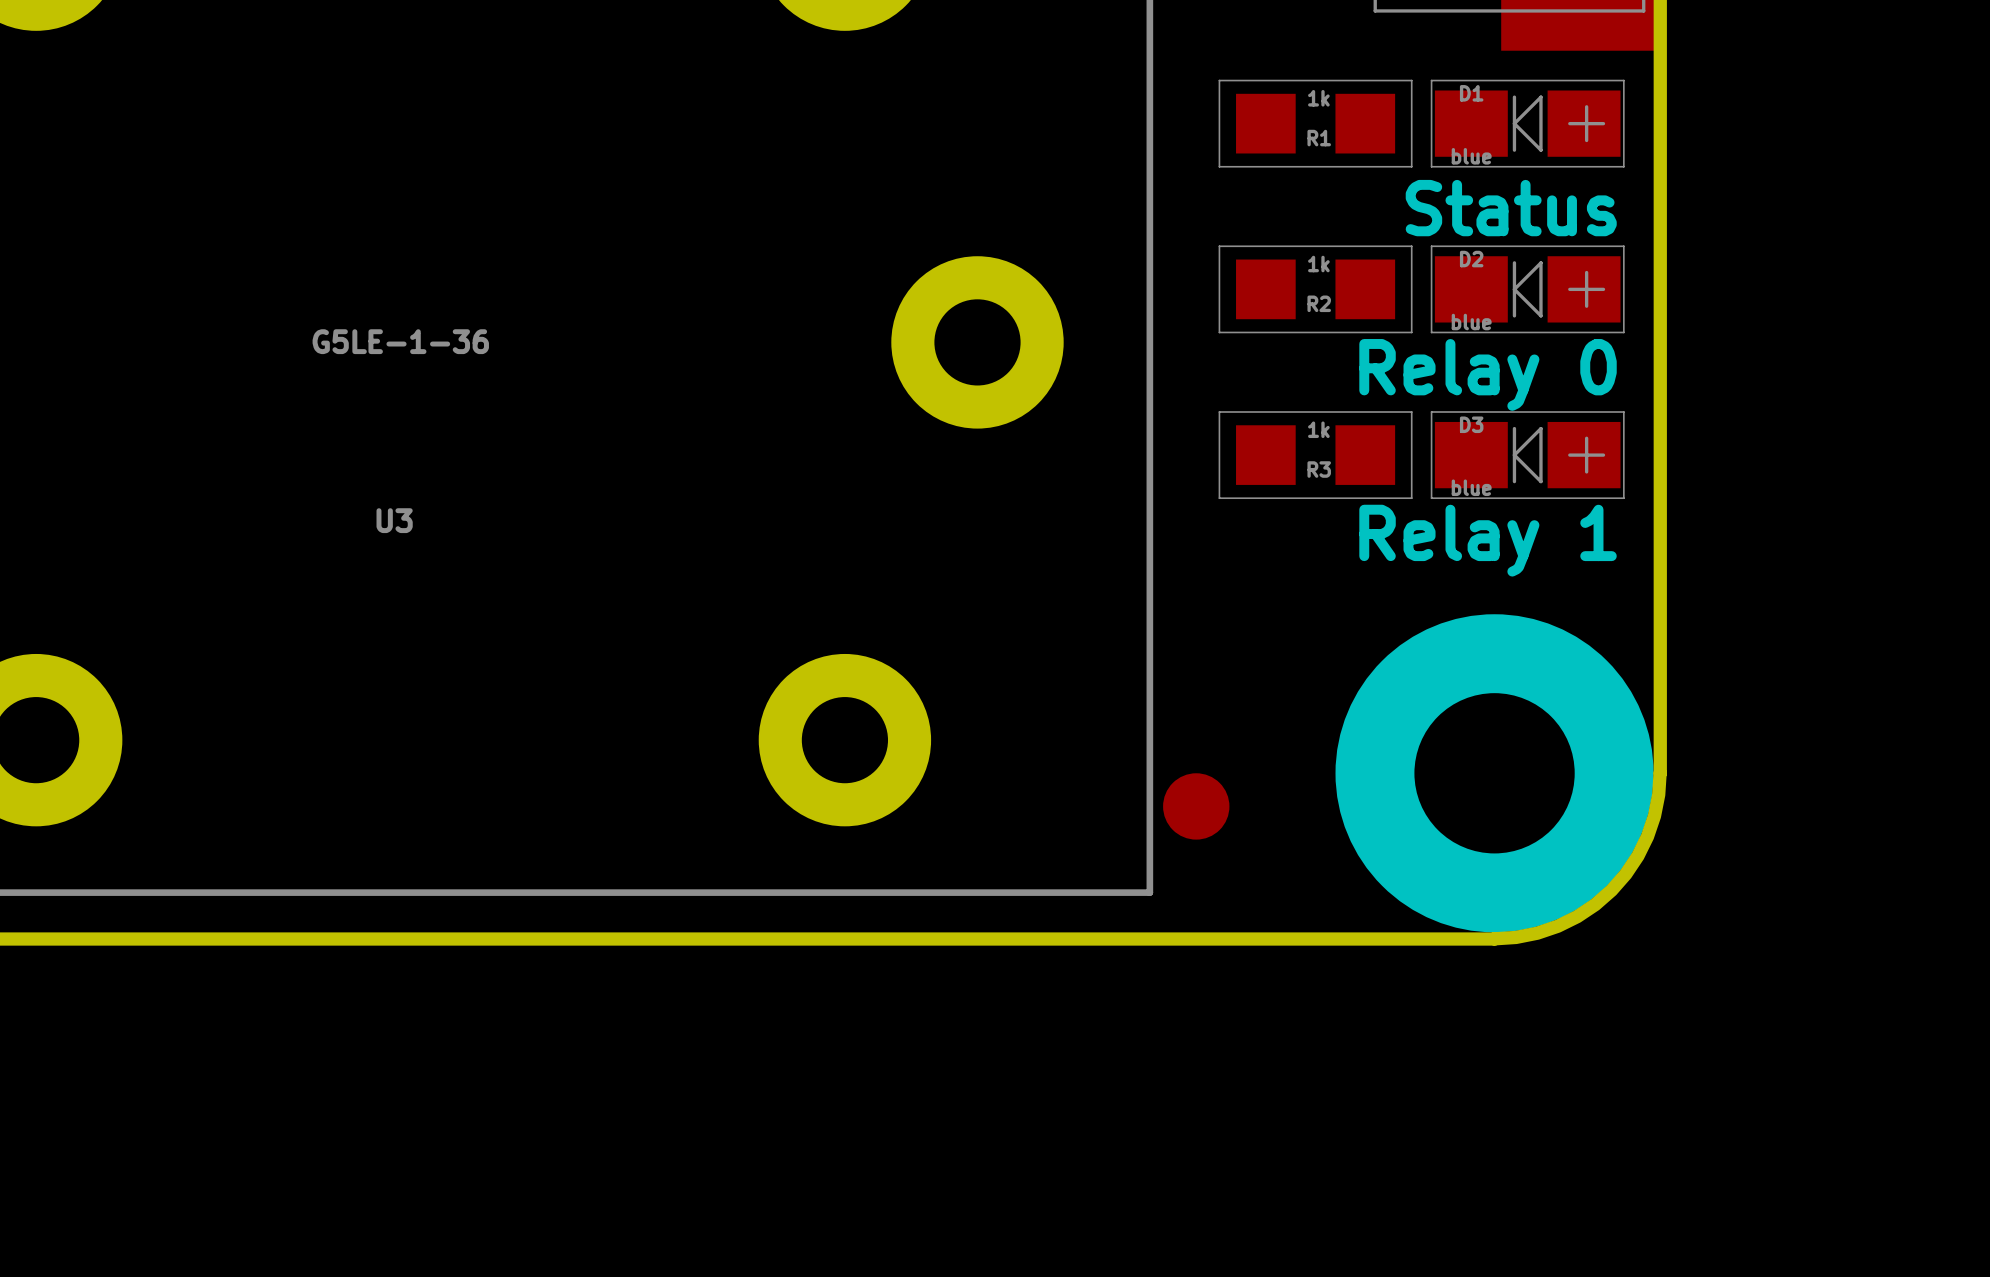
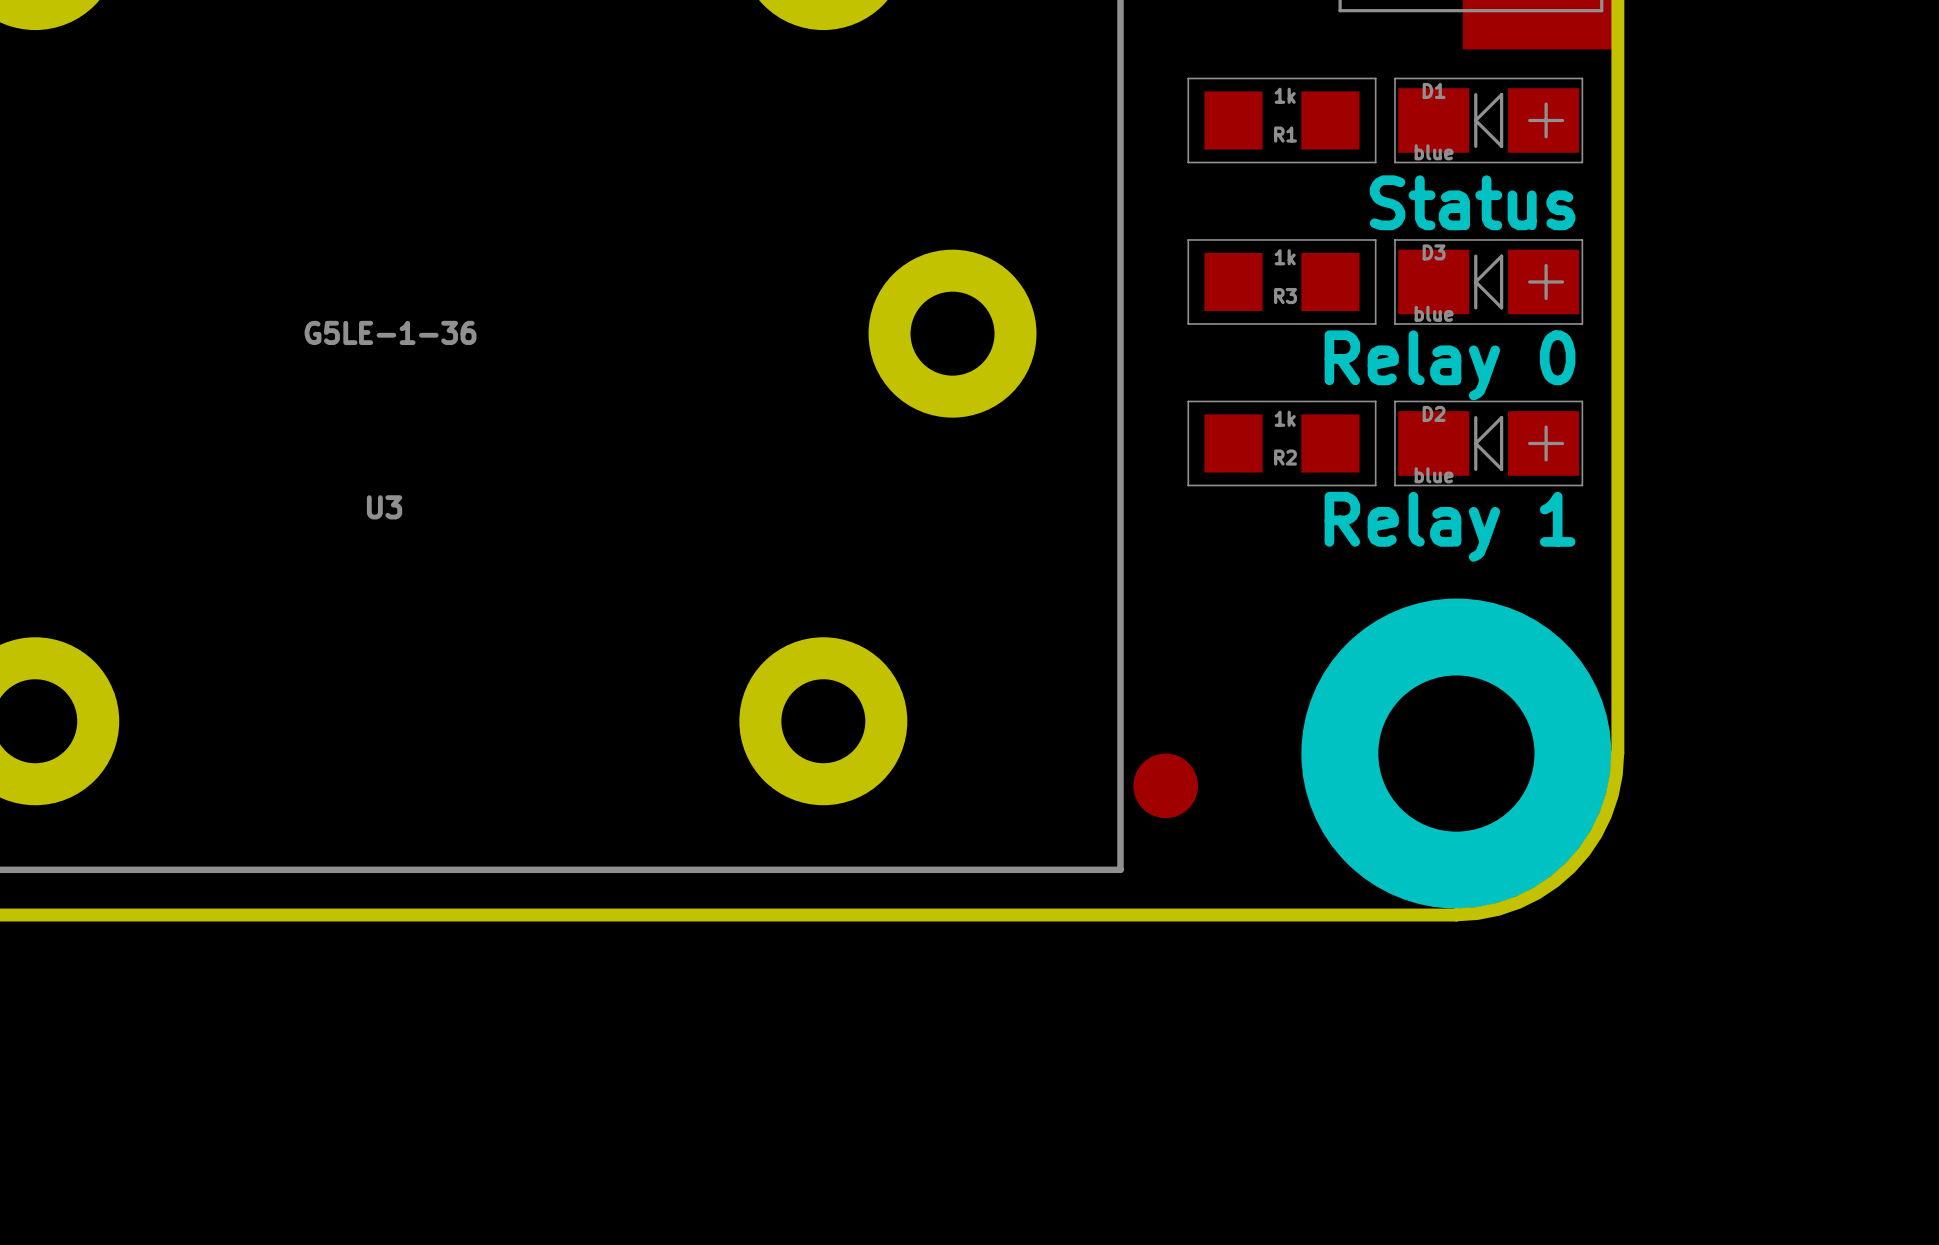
D2 name: D2 (1471, 259) -> D3 (1434, 252)
R2 name: R2 (1319, 303) -> R3 (1285, 296)
D3 name: D3 (1471, 424) -> D2 (1434, 413)
R3 name: R3 (1319, 469) -> R2 (1285, 457)

